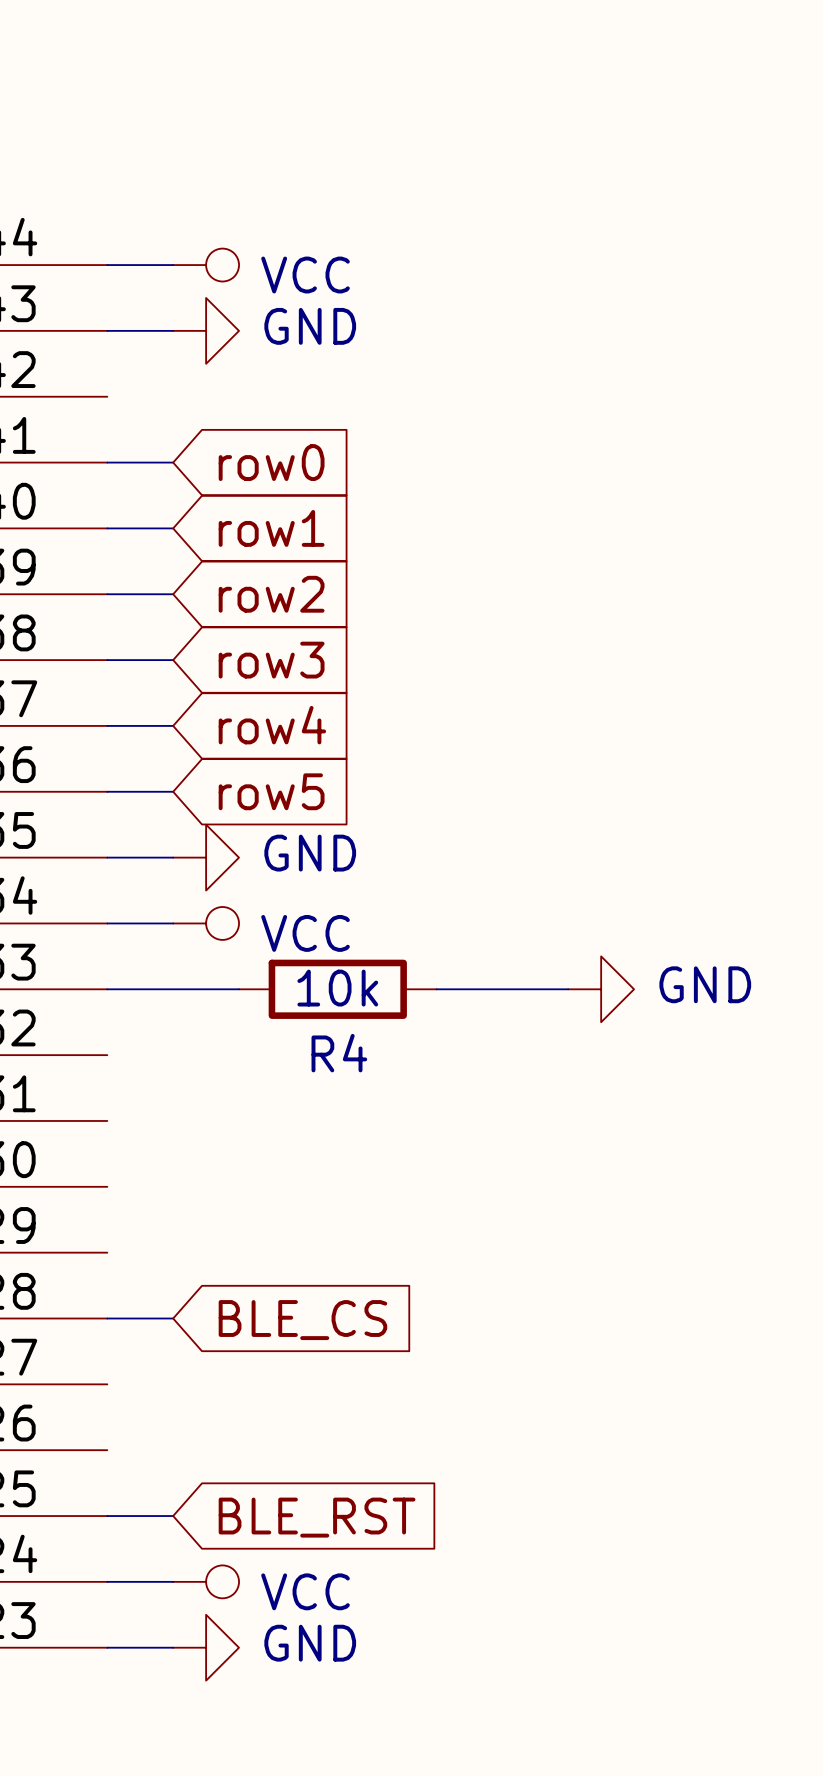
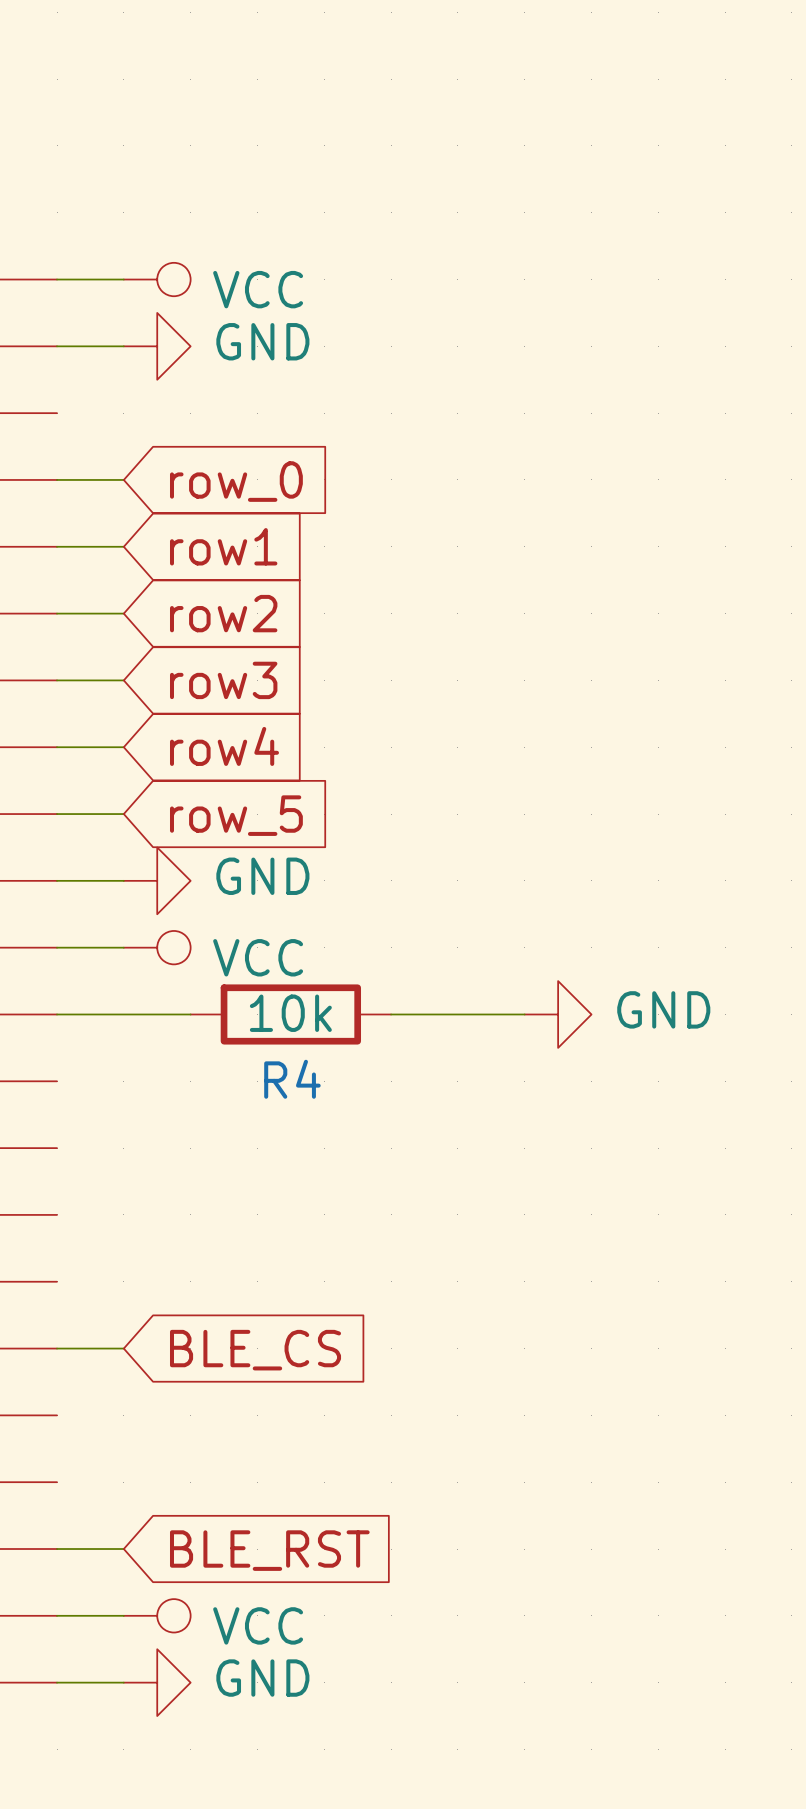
global label: row0 (271, 462) -> row_0 (236, 481)
global label: row5 (271, 791) -> row_5 (236, 815)

